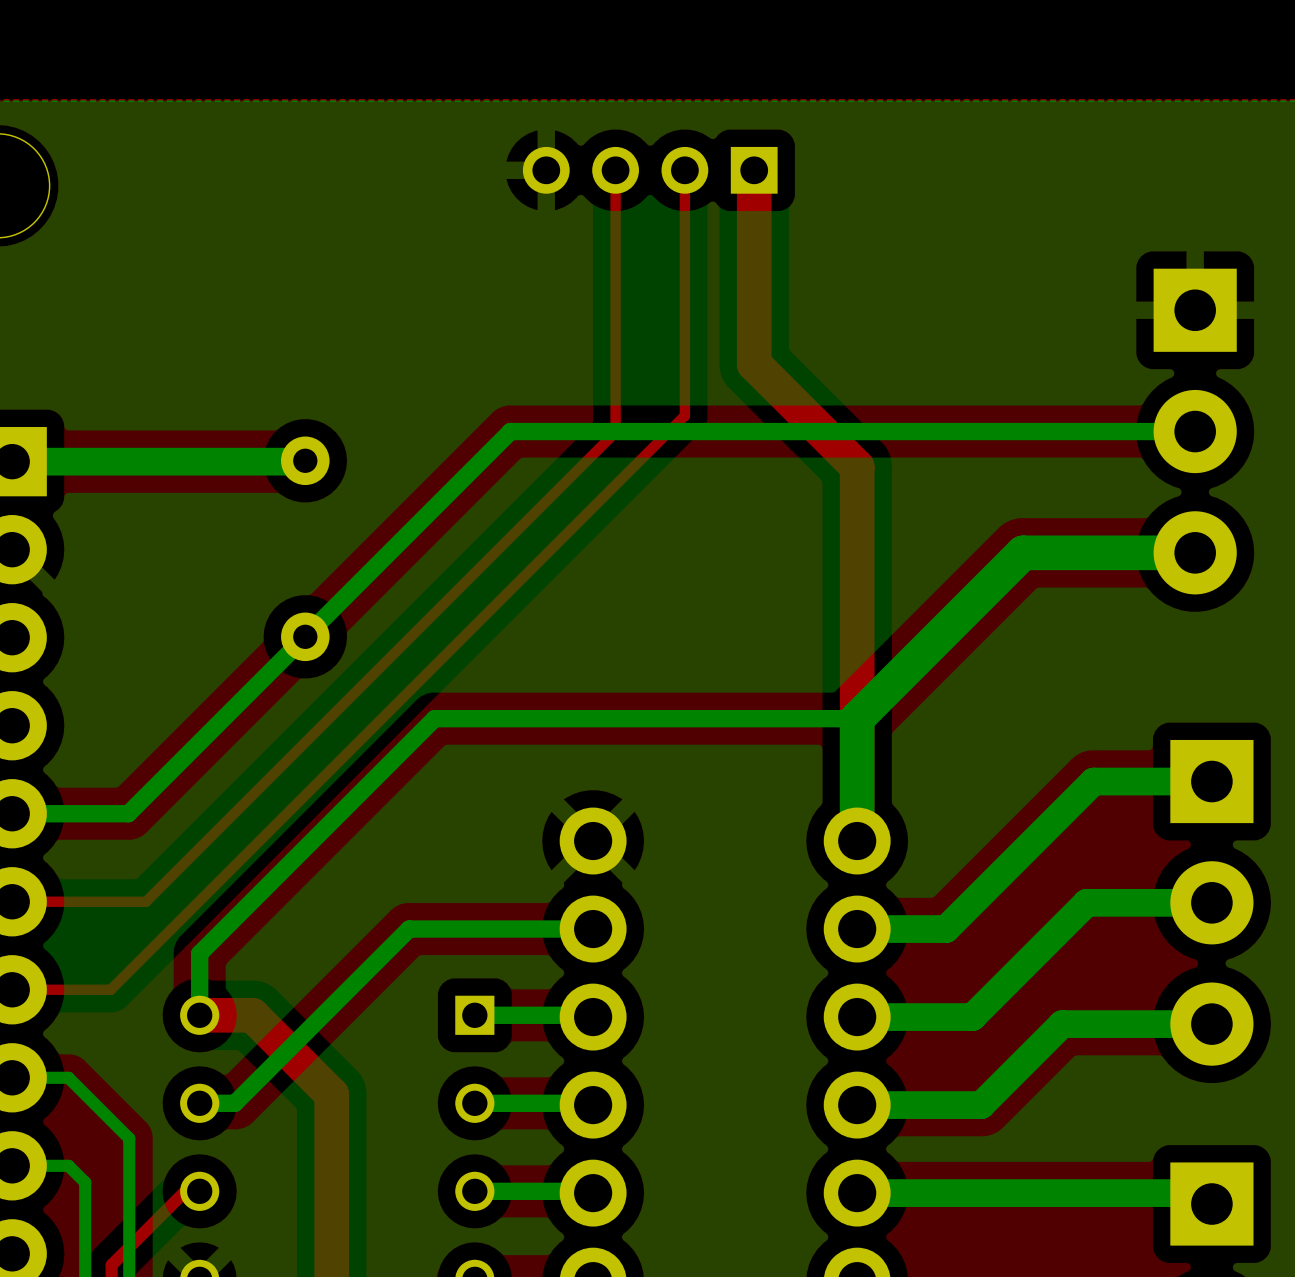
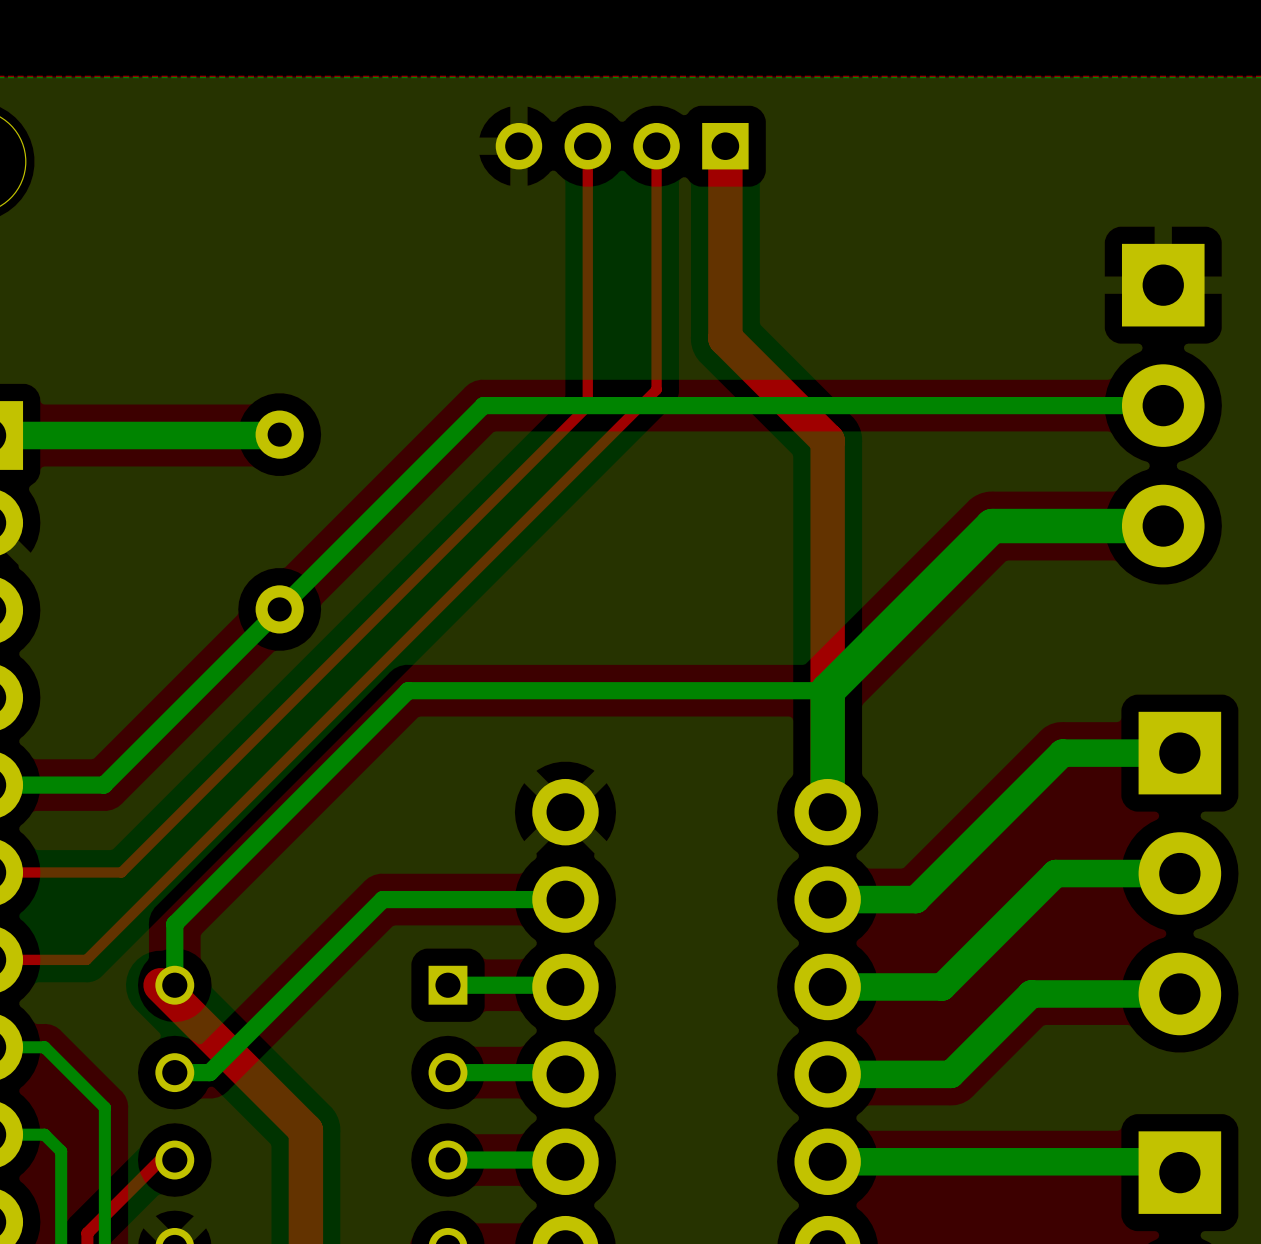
top track: (199, 1015) (252, 1015) (331, 1094) (331, 1161) -> (160, 985) (305, 1130)

